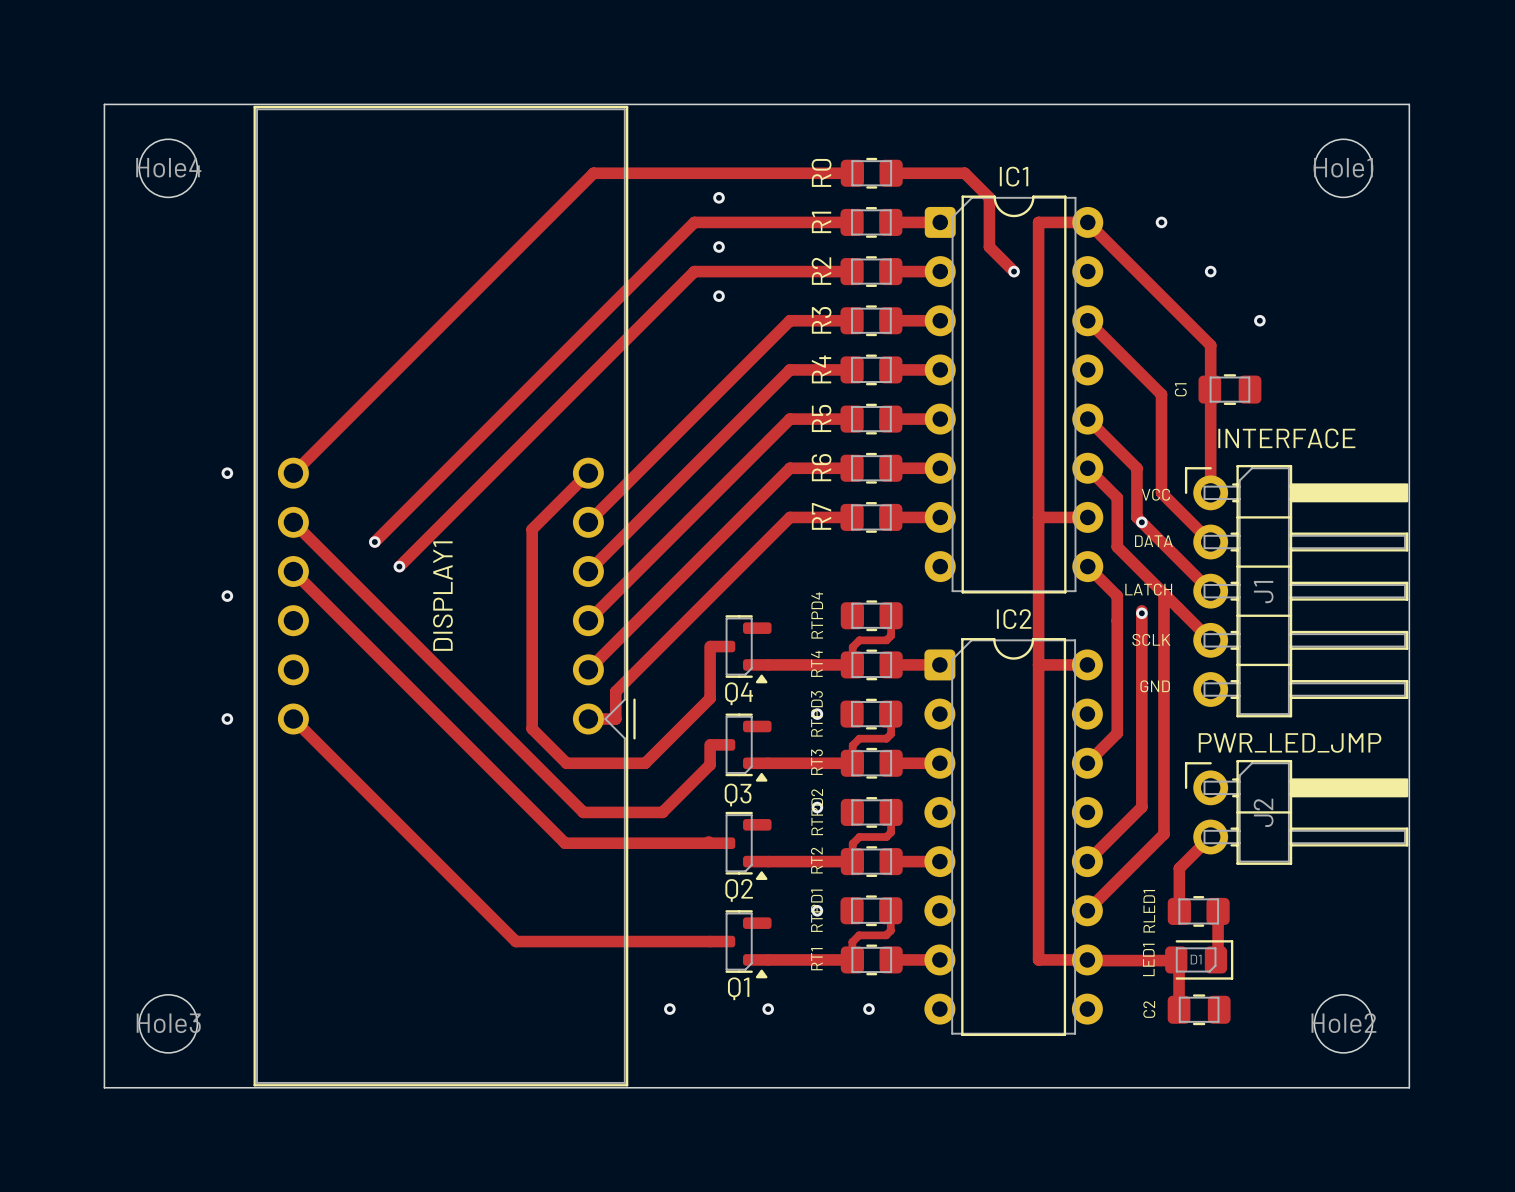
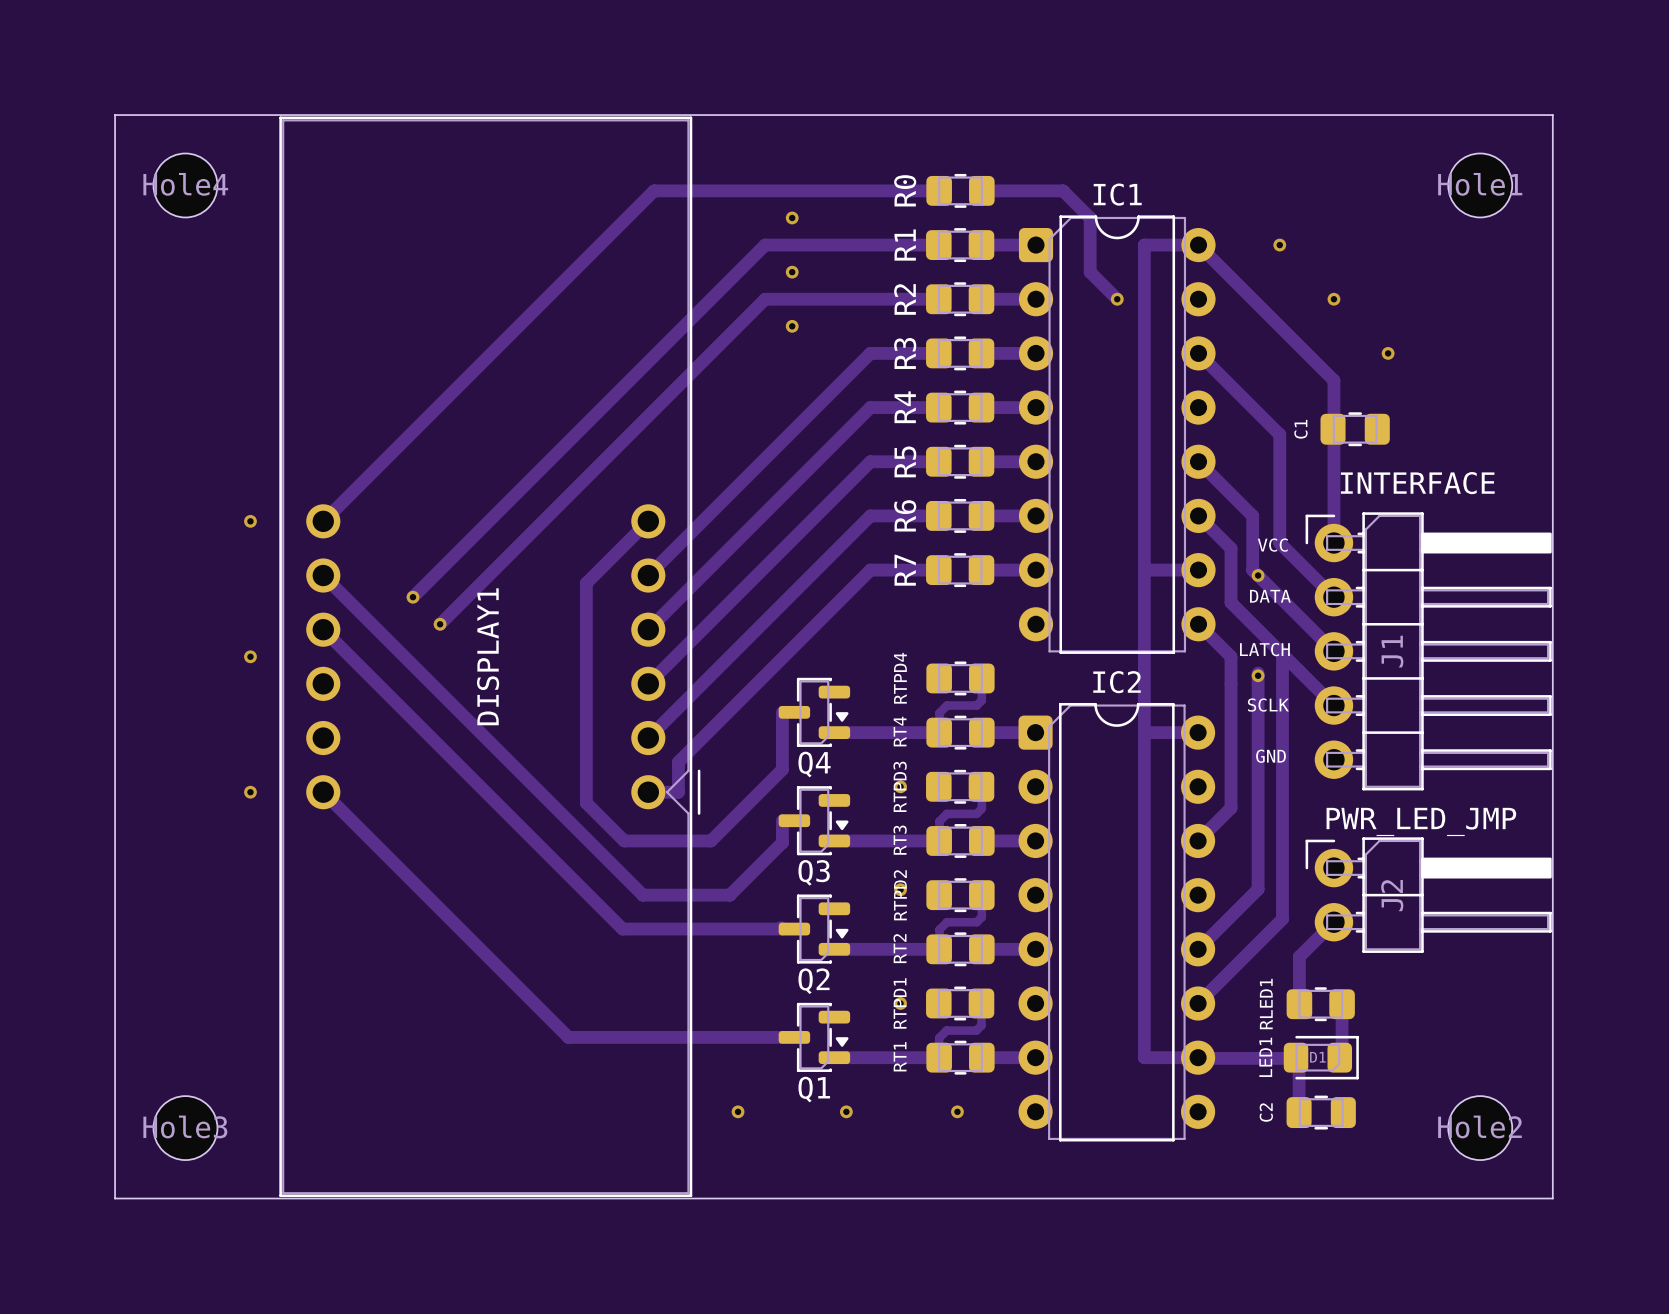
Q4 footprint: [706, 615, 772, 684] -> [778, 677, 851, 747]
Q3 footprint: [706, 713, 772, 782] -> [778, 786, 851, 856]
Q2 footprint: [706, 811, 772, 880] -> [778, 894, 851, 964]
Q1 footprint: [706, 910, 772, 979] -> [778, 1002, 851, 1072]

